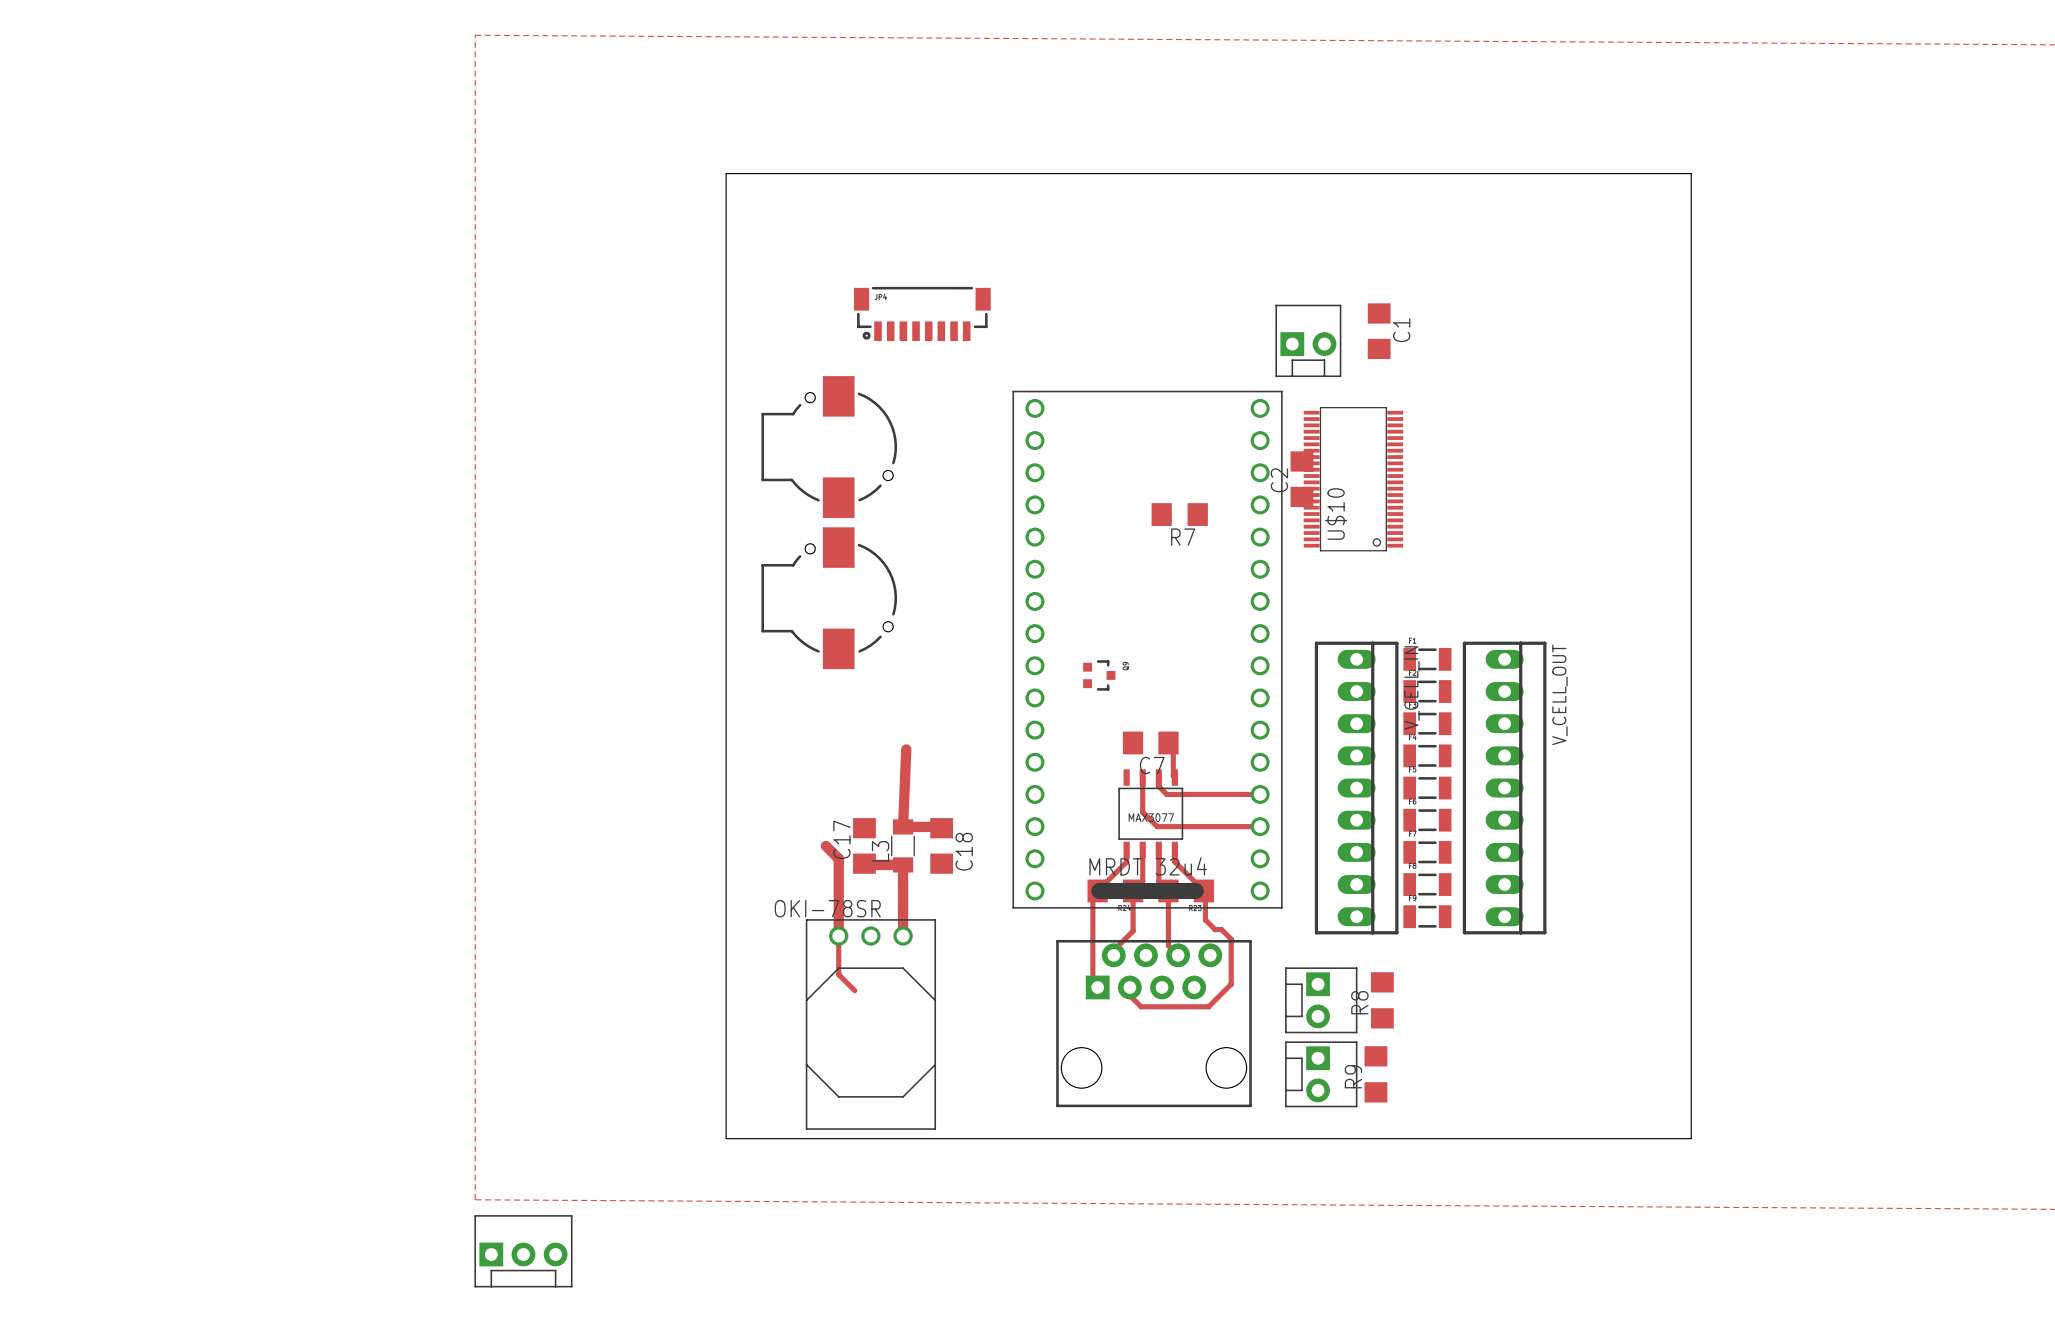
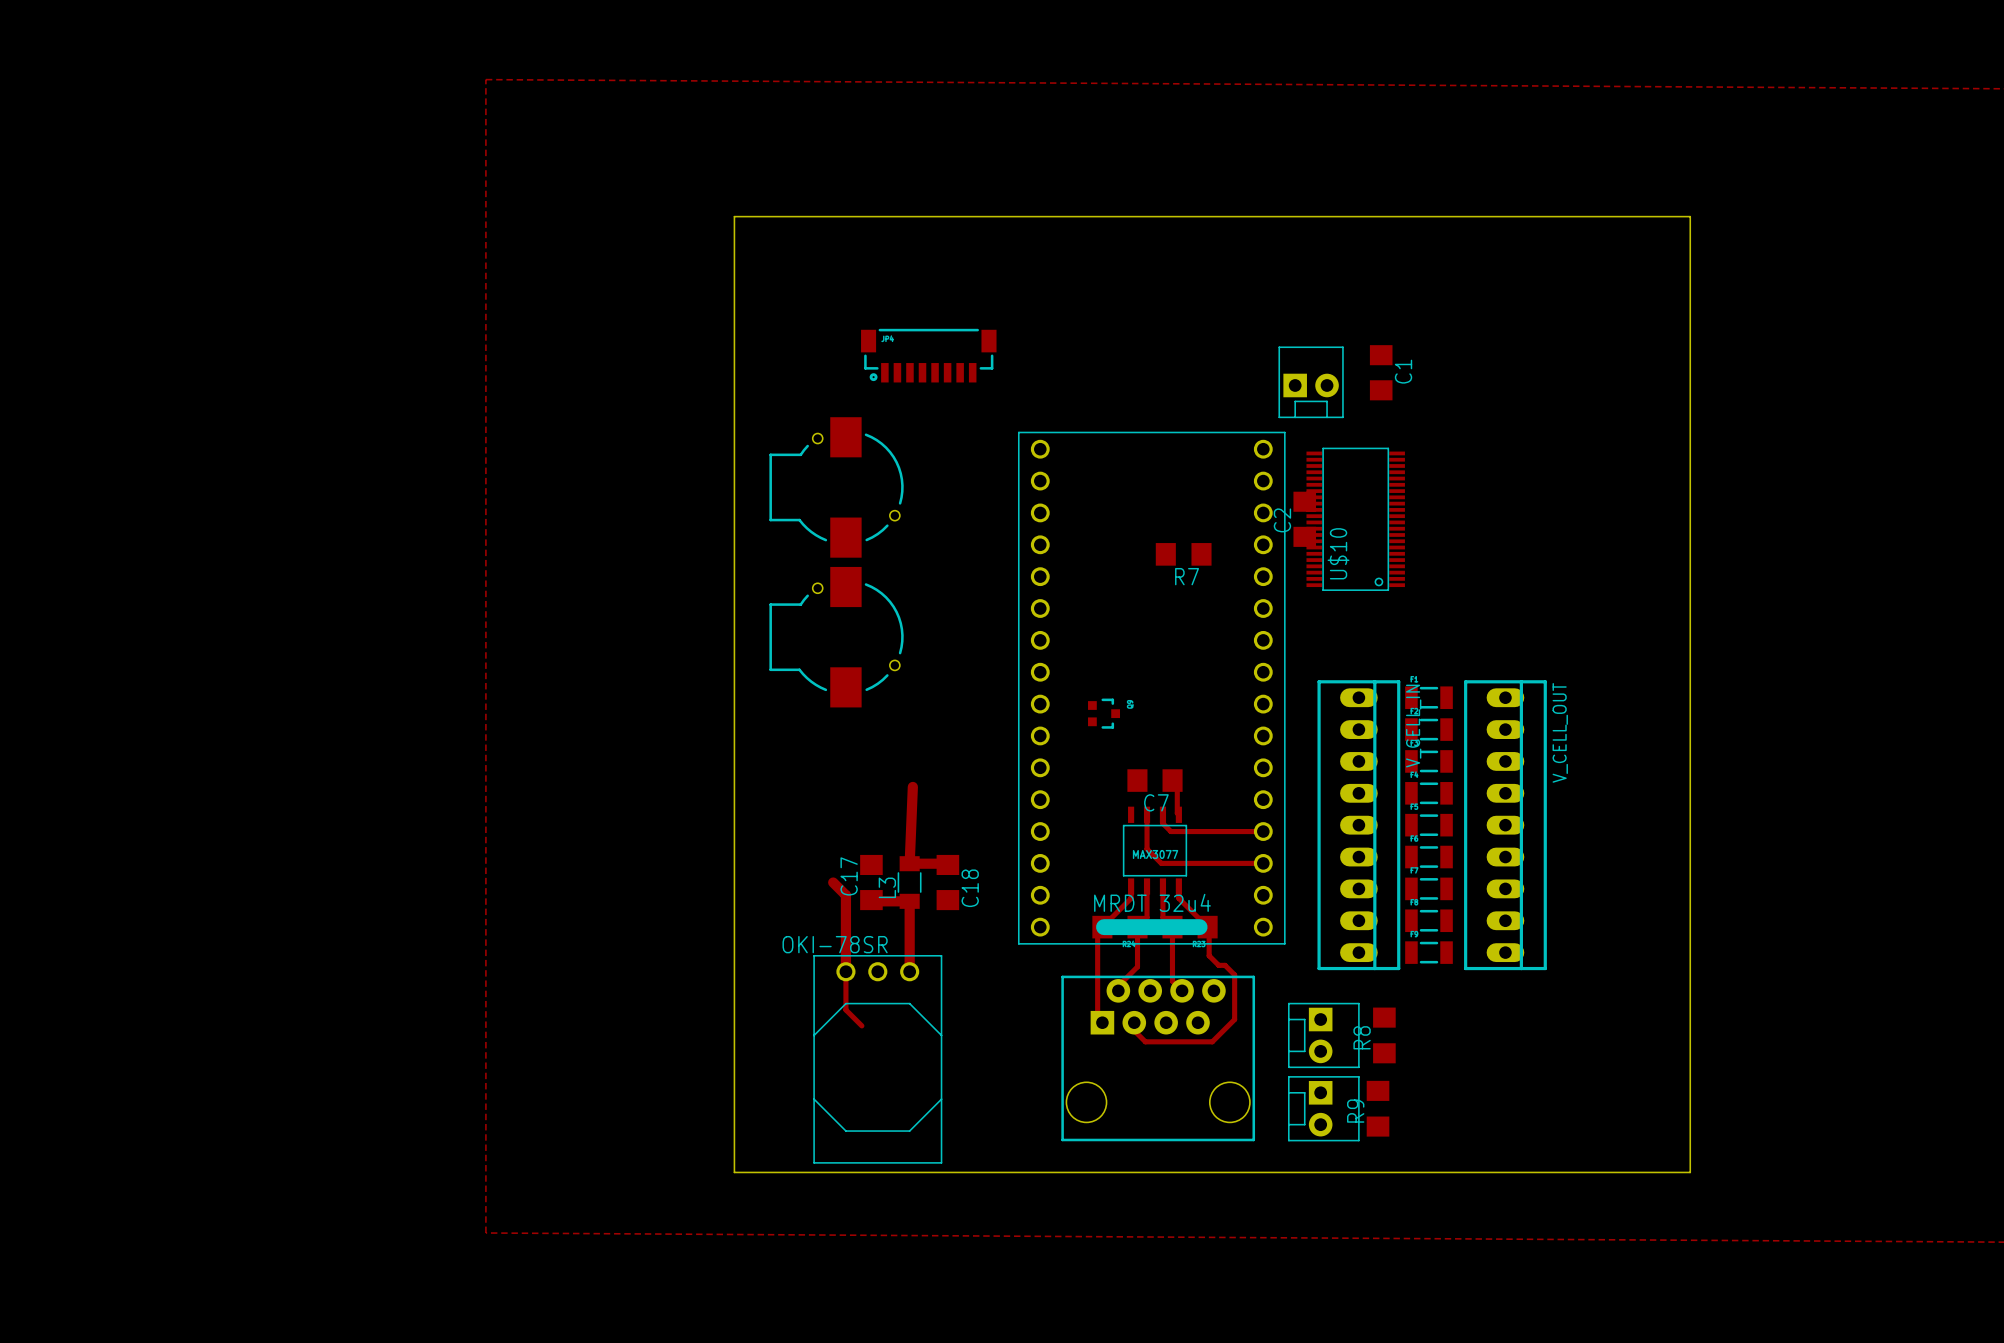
part: (523, 1251) -> none

